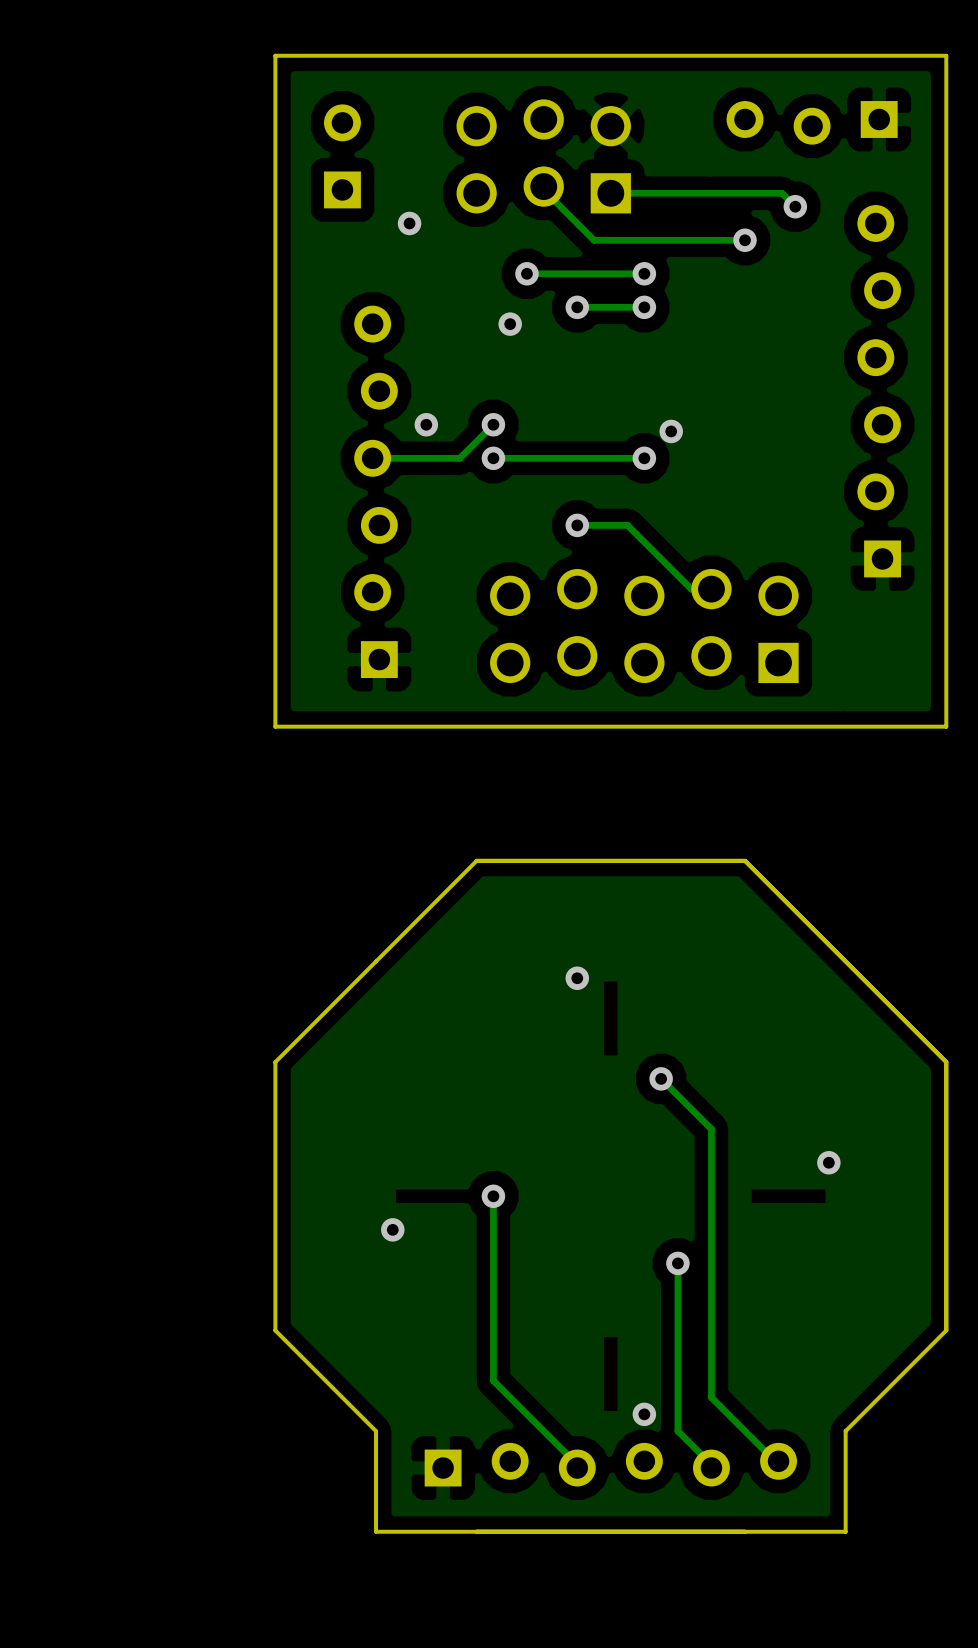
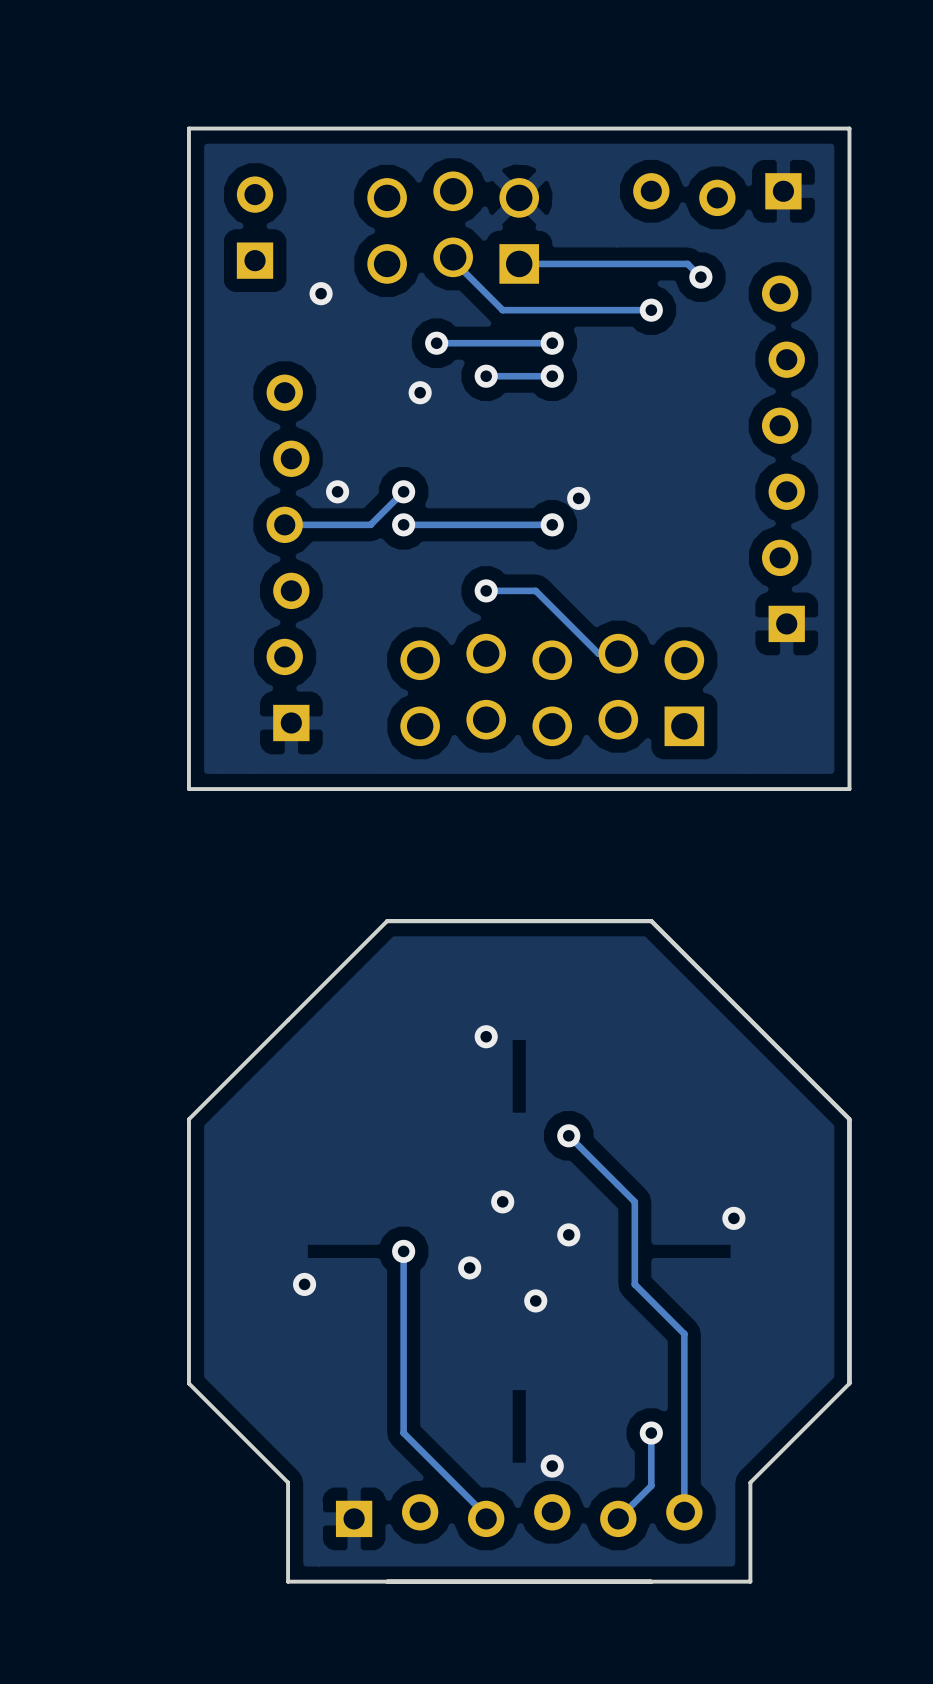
track: (711, 1129) (711, 1397) (775, 1461) (778, 1461) -> (618, 1185) (634, 1201) (634, 1284) (684, 1333) (684, 1512)
via: none -> (502, 1201)
via: none -> (568, 1234)
via: none -> (469, 1267)
via: none -> (535, 1300)
track: (677, 1263) (677, 1431) (711, 1464) (711, 1468) -> (651, 1433) (651, 1485) (618, 1518)
via: (677, 1263) -> none
via: none -> (651, 1433)

